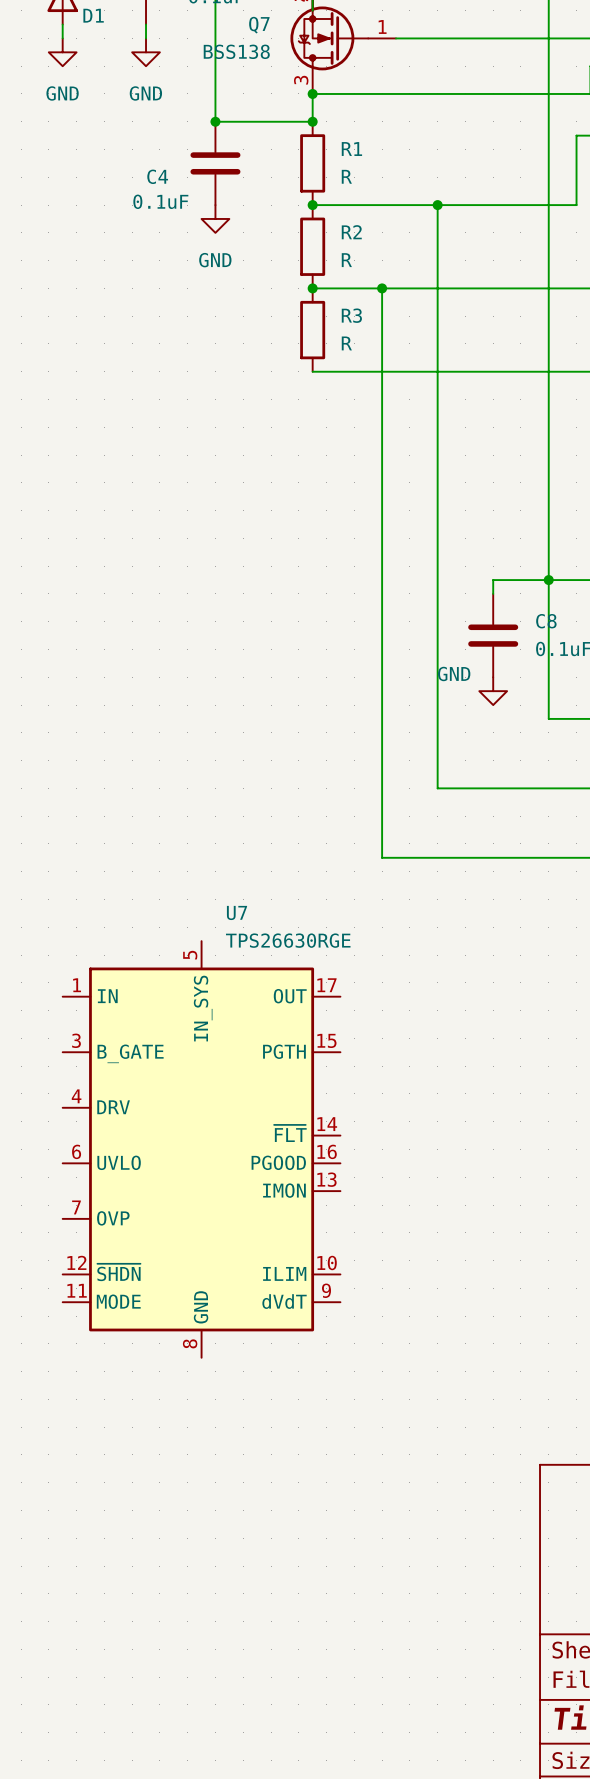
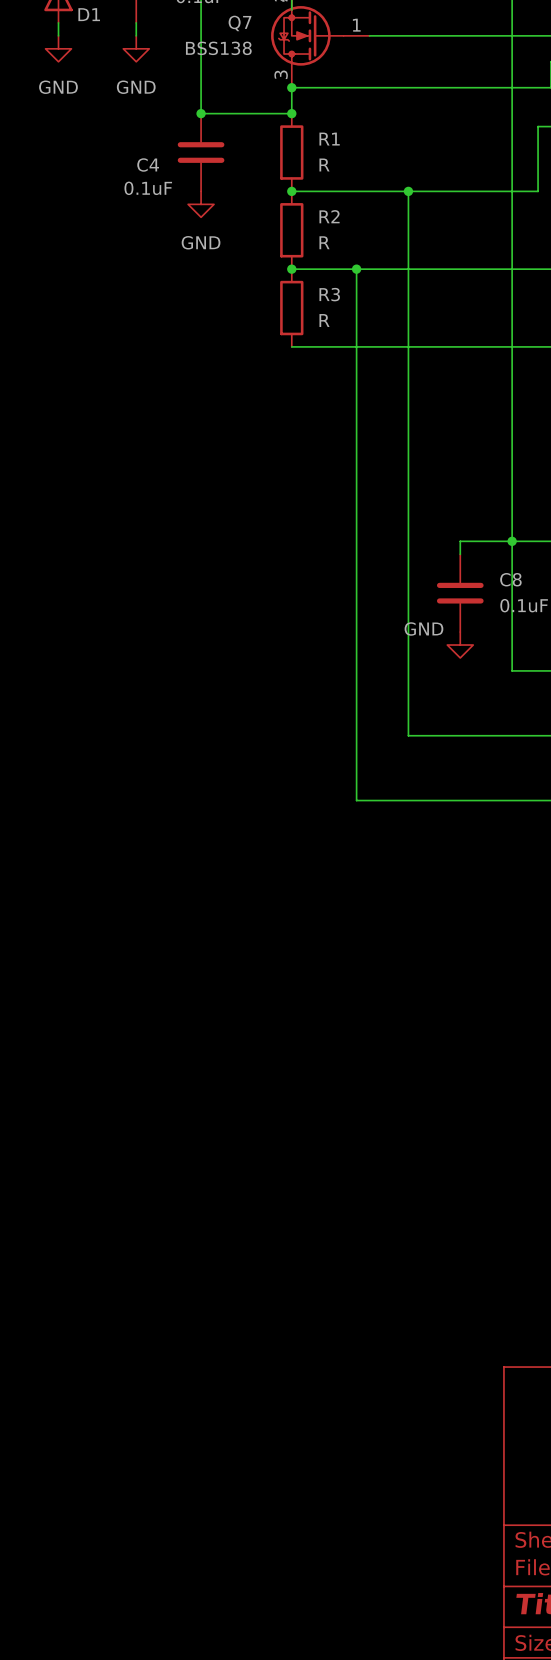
U7: TPS26630RGE (201, 1149) -> none

